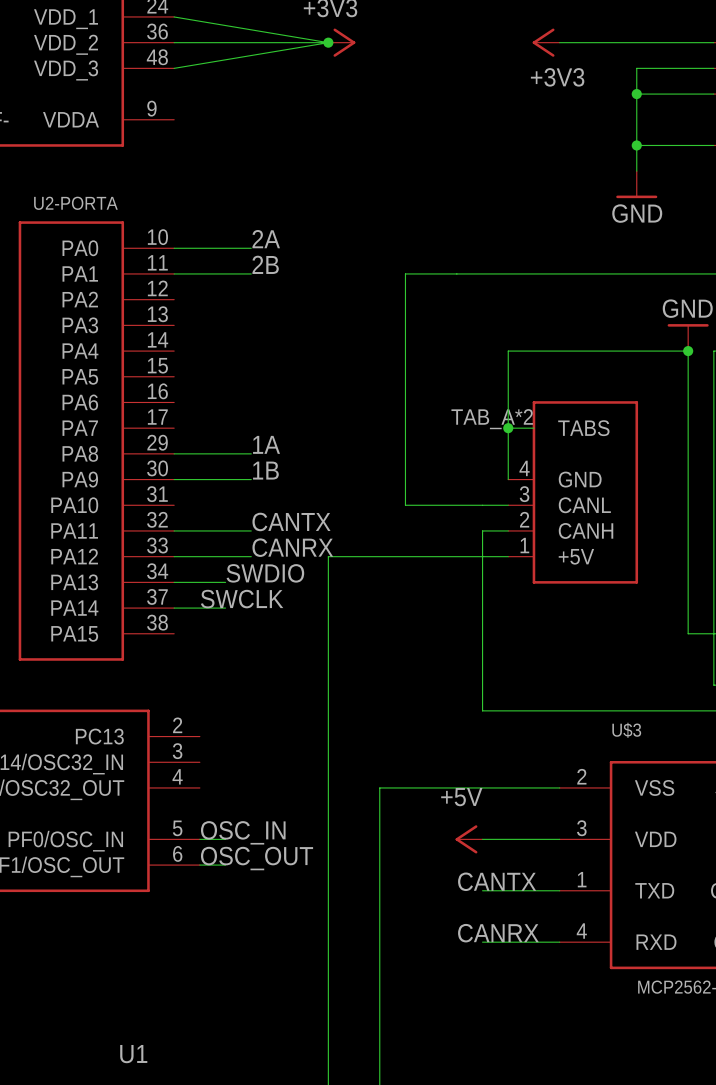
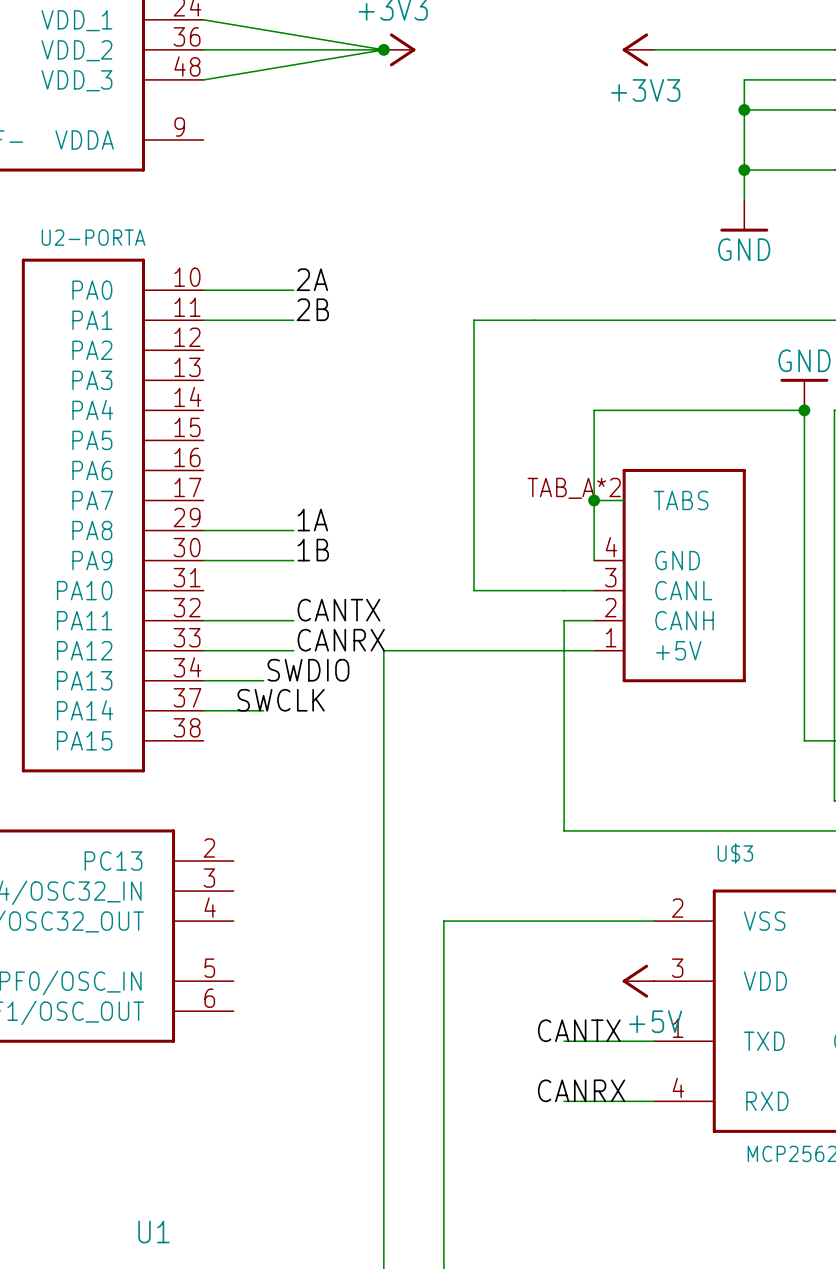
power symbol text position: +5V (461, 797) -> +5V (655, 1021)
label: OSC_IN (243, 832) -> none
wire: (199, 839) (225, 839) -> none
power symbol position: +5V (469, 839) -> +5V (638, 981)
wire: (482, 839) (559, 839) -> none
label: OSC_OUT (257, 858) -> none
wire: (199, 865) (225, 865) -> none

